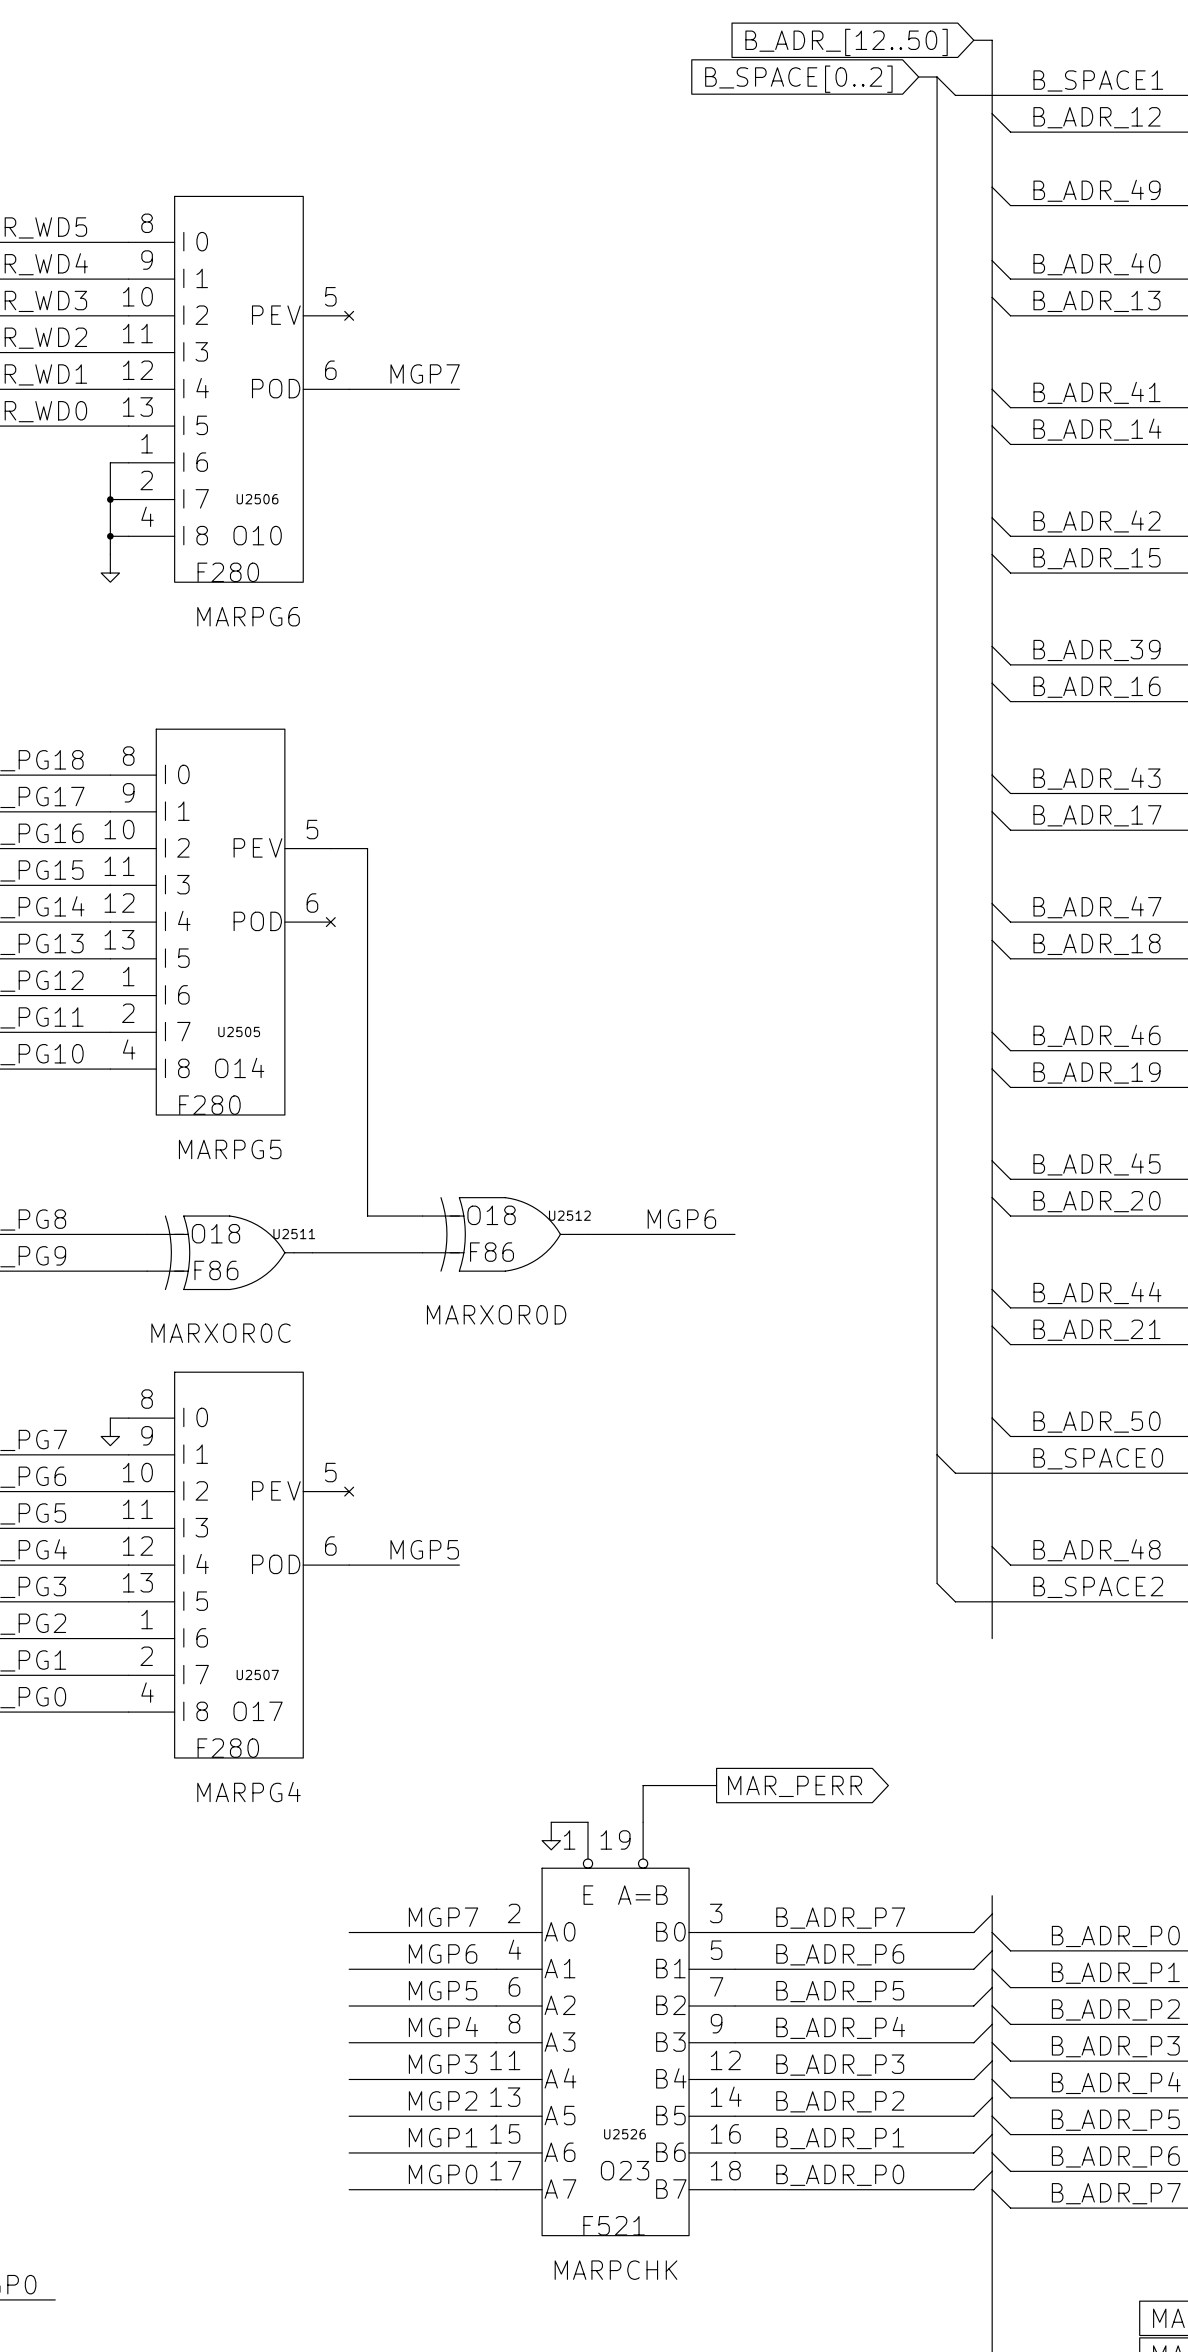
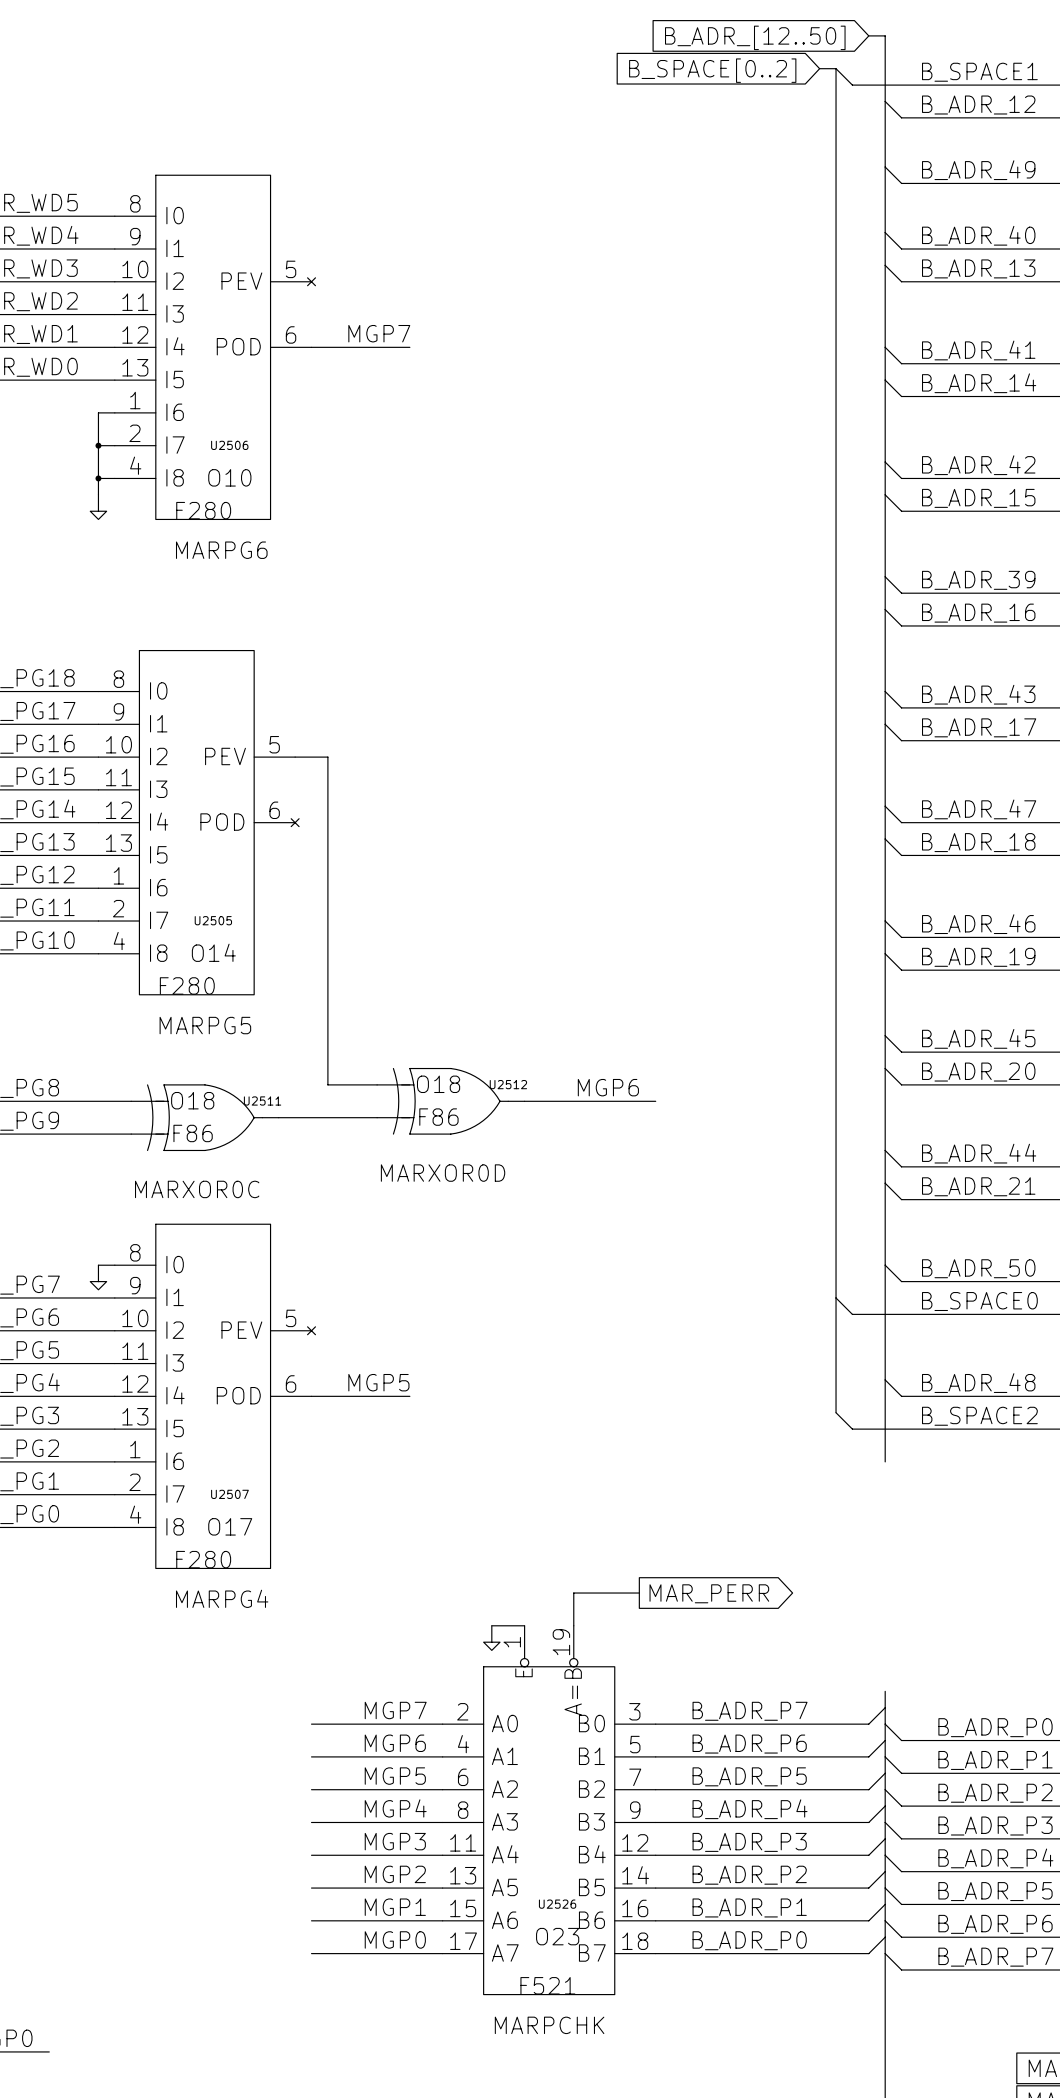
U2506 symbol: [128, 196, 350, 583] -> [114, 175, 312, 520]
U2505 symbol: [110, 729, 331, 1115] -> [98, 650, 296, 995]
U2507 symbol: [128, 1372, 350, 1758] -> [114, 1224, 312, 1569]
U2526 symbol: [496, 1822, 735, 2236] -> [442, 1625, 656, 1995]

